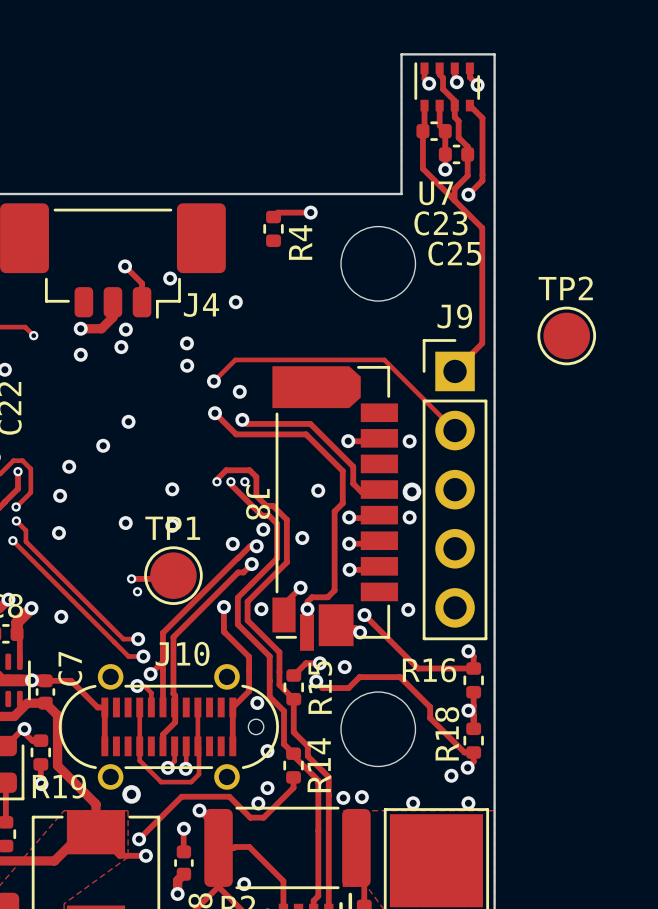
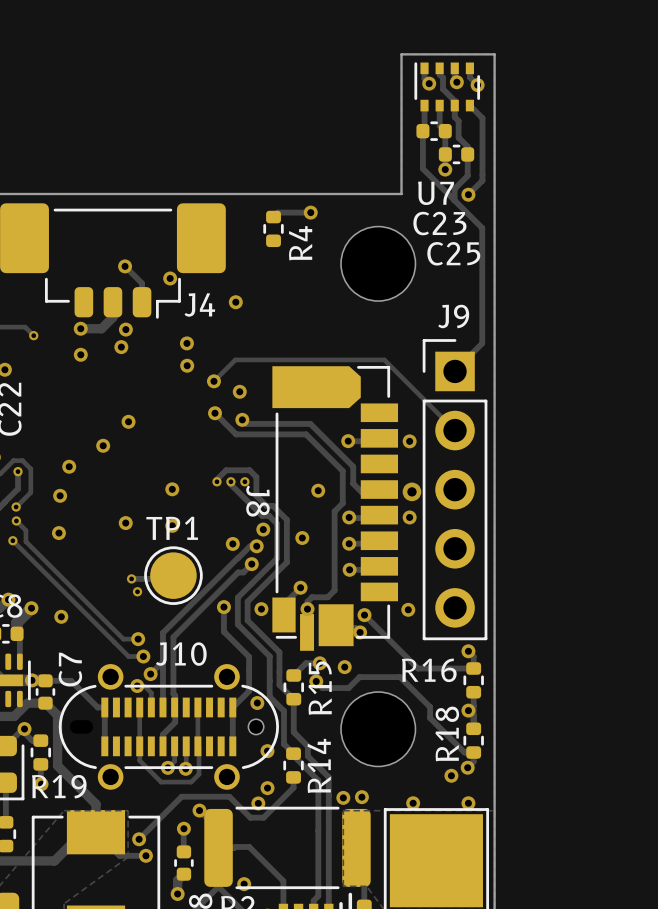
TP2: (566, 335) -> none
via: (131, 794) -> none

